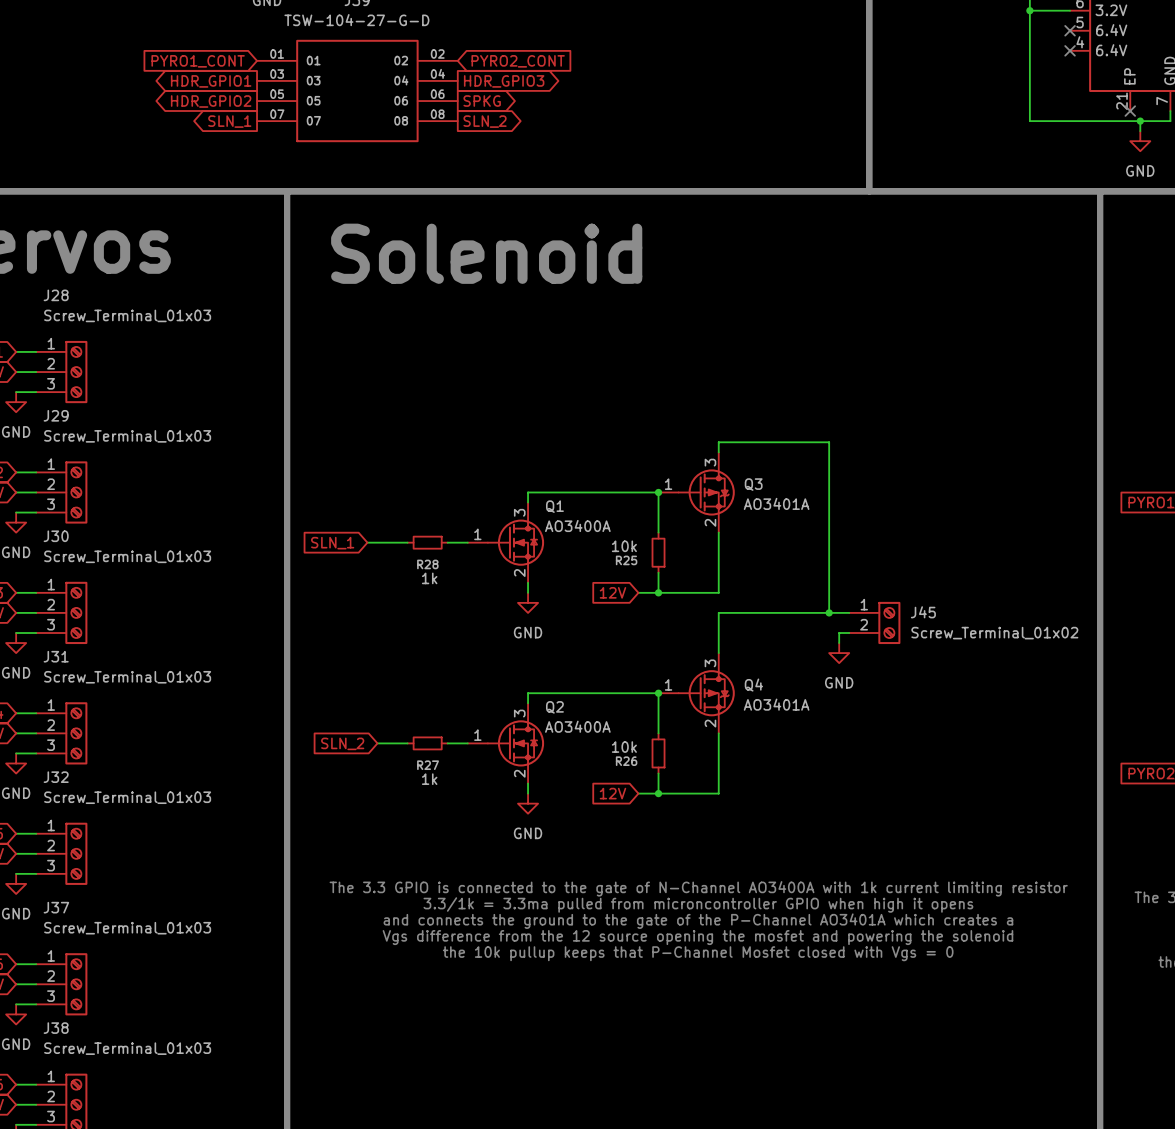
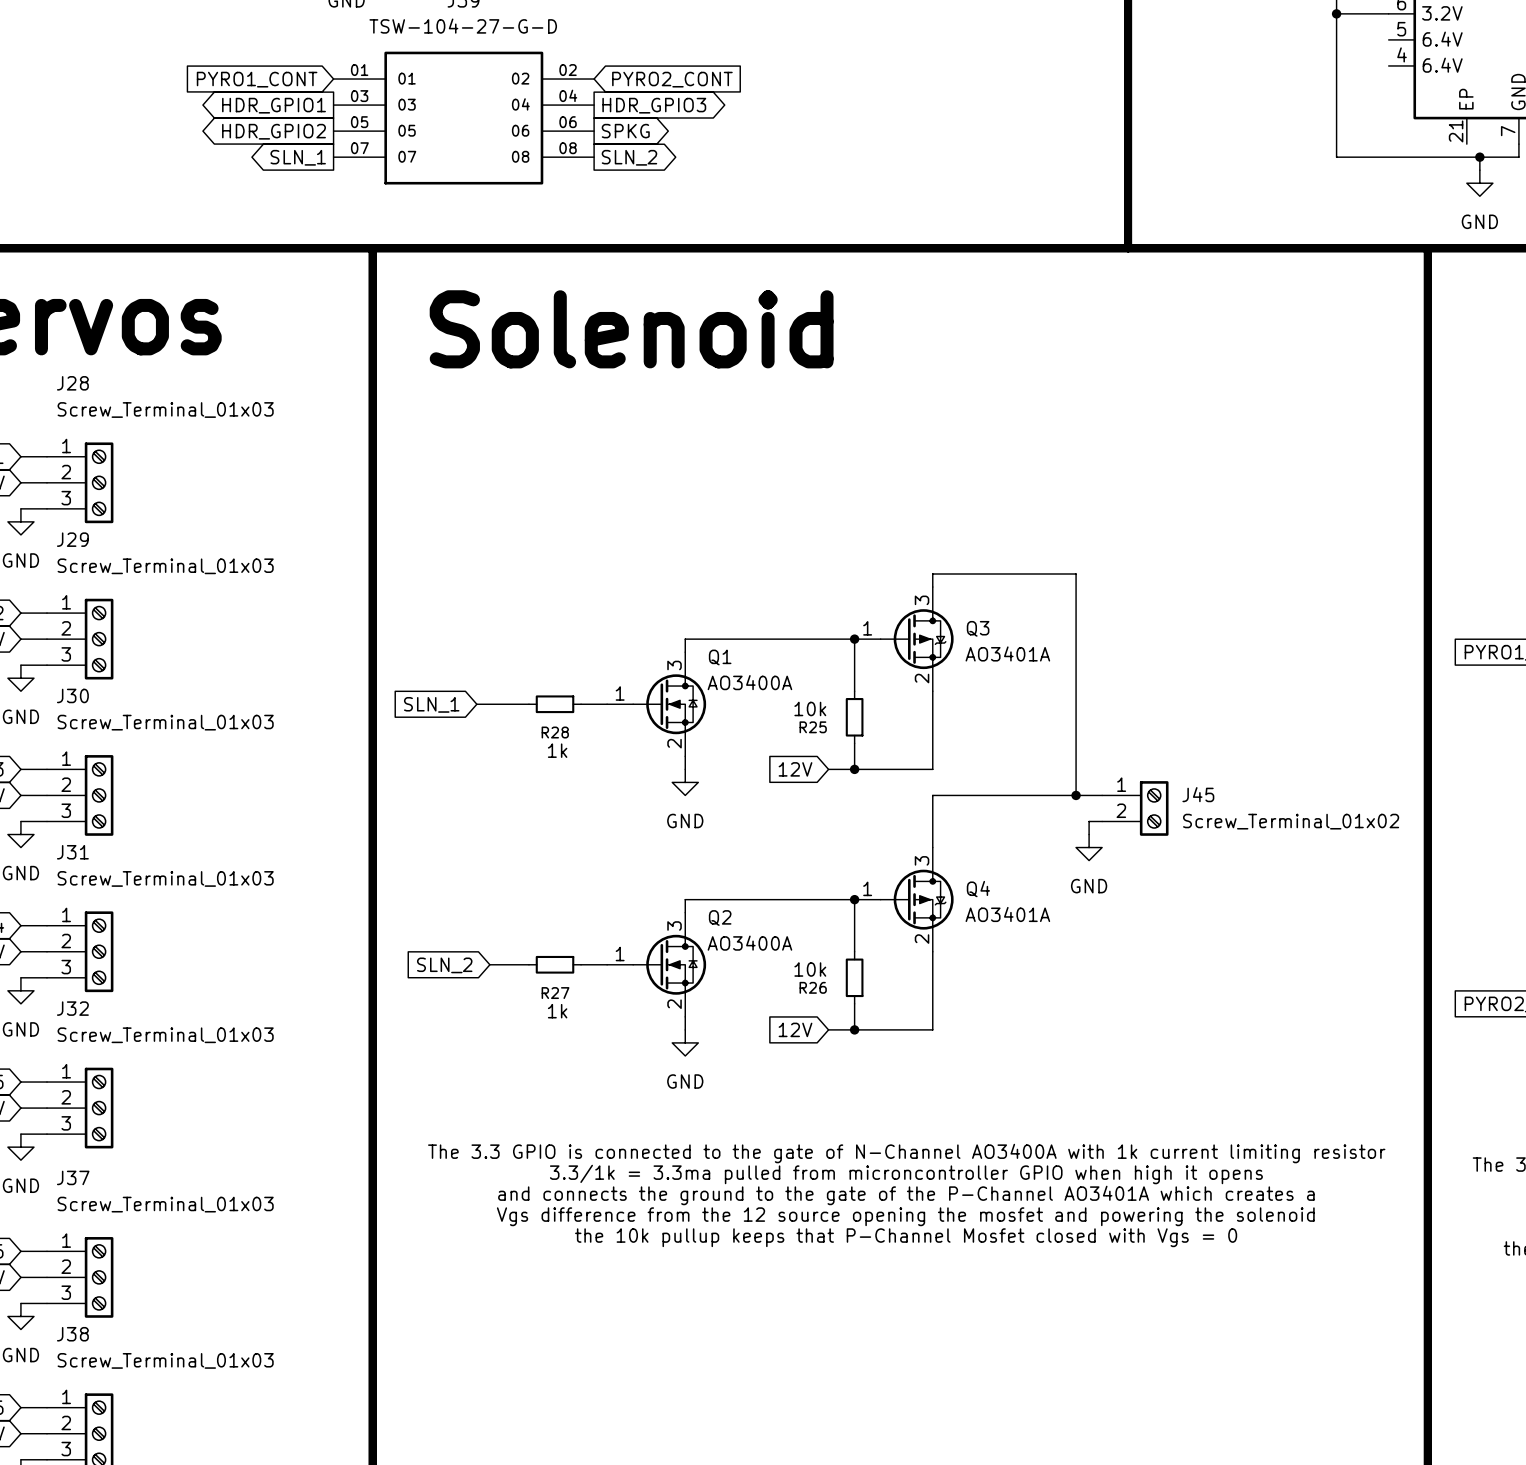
no-connect mark: (1070, 30) -> none
no-connect mark: (1070, 50) -> none
no-connect mark: (1130, 111) -> none

